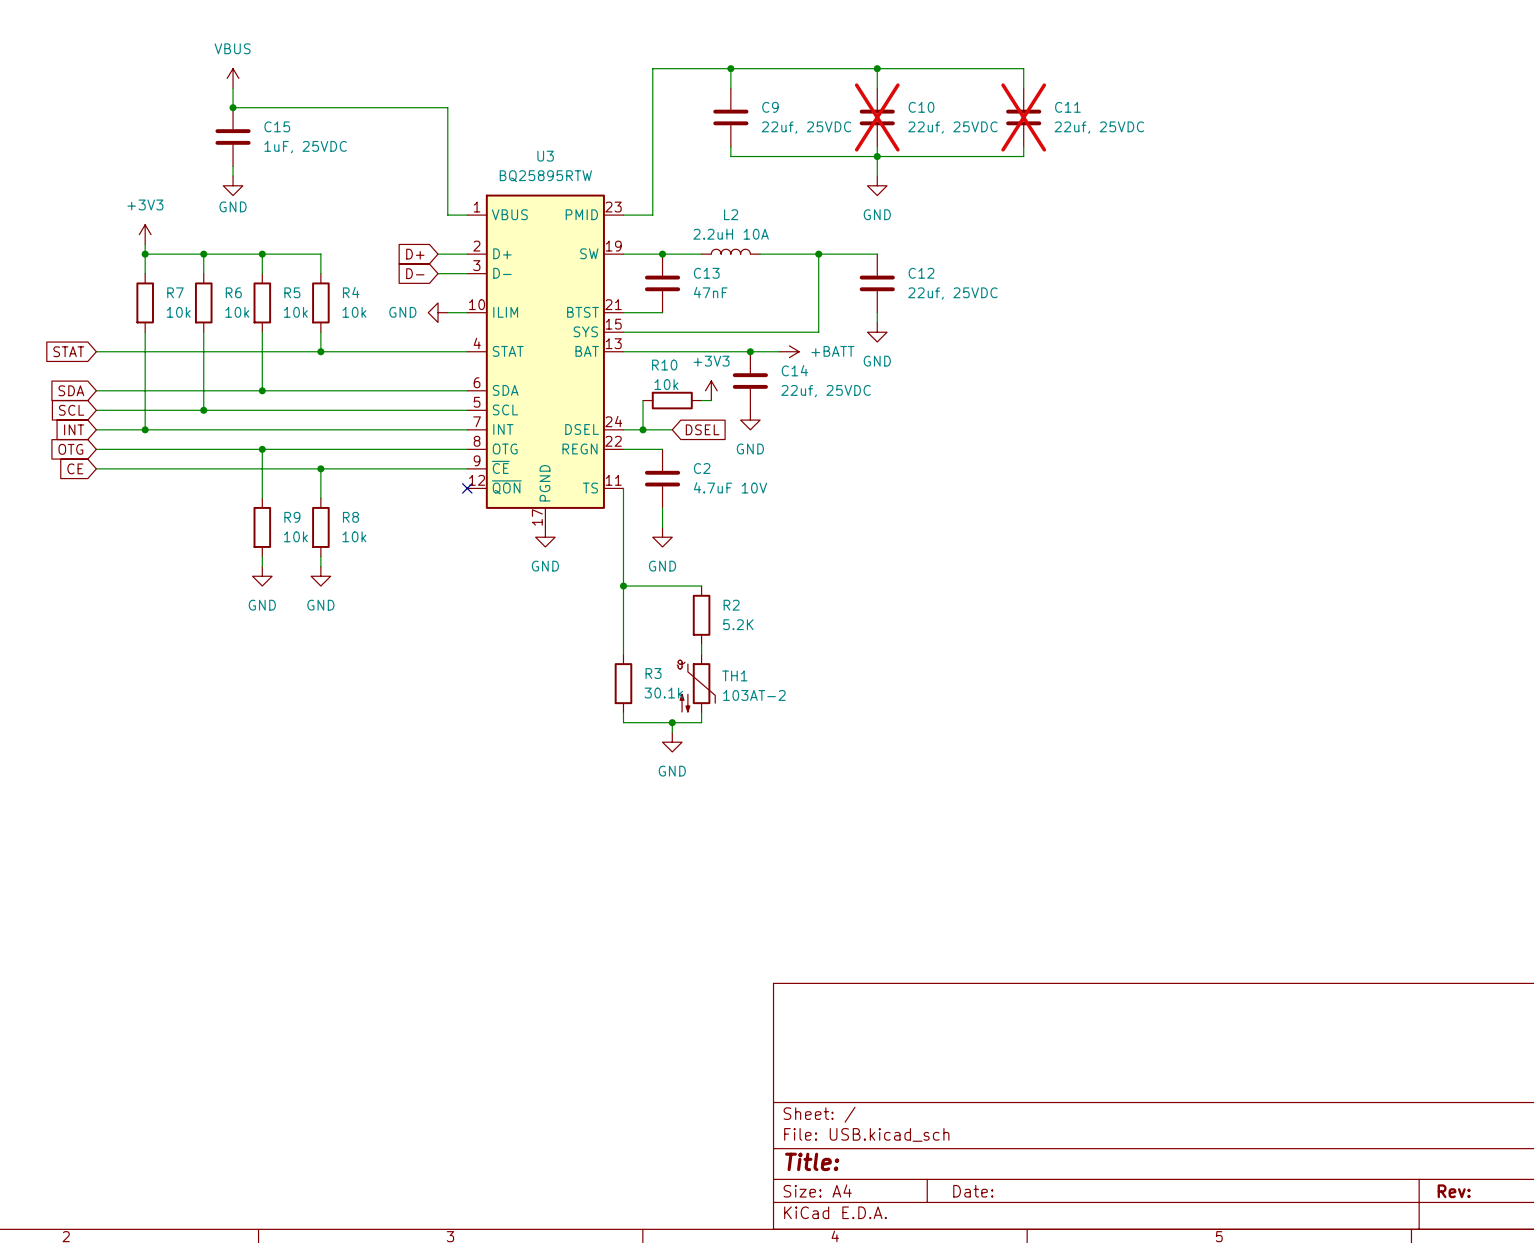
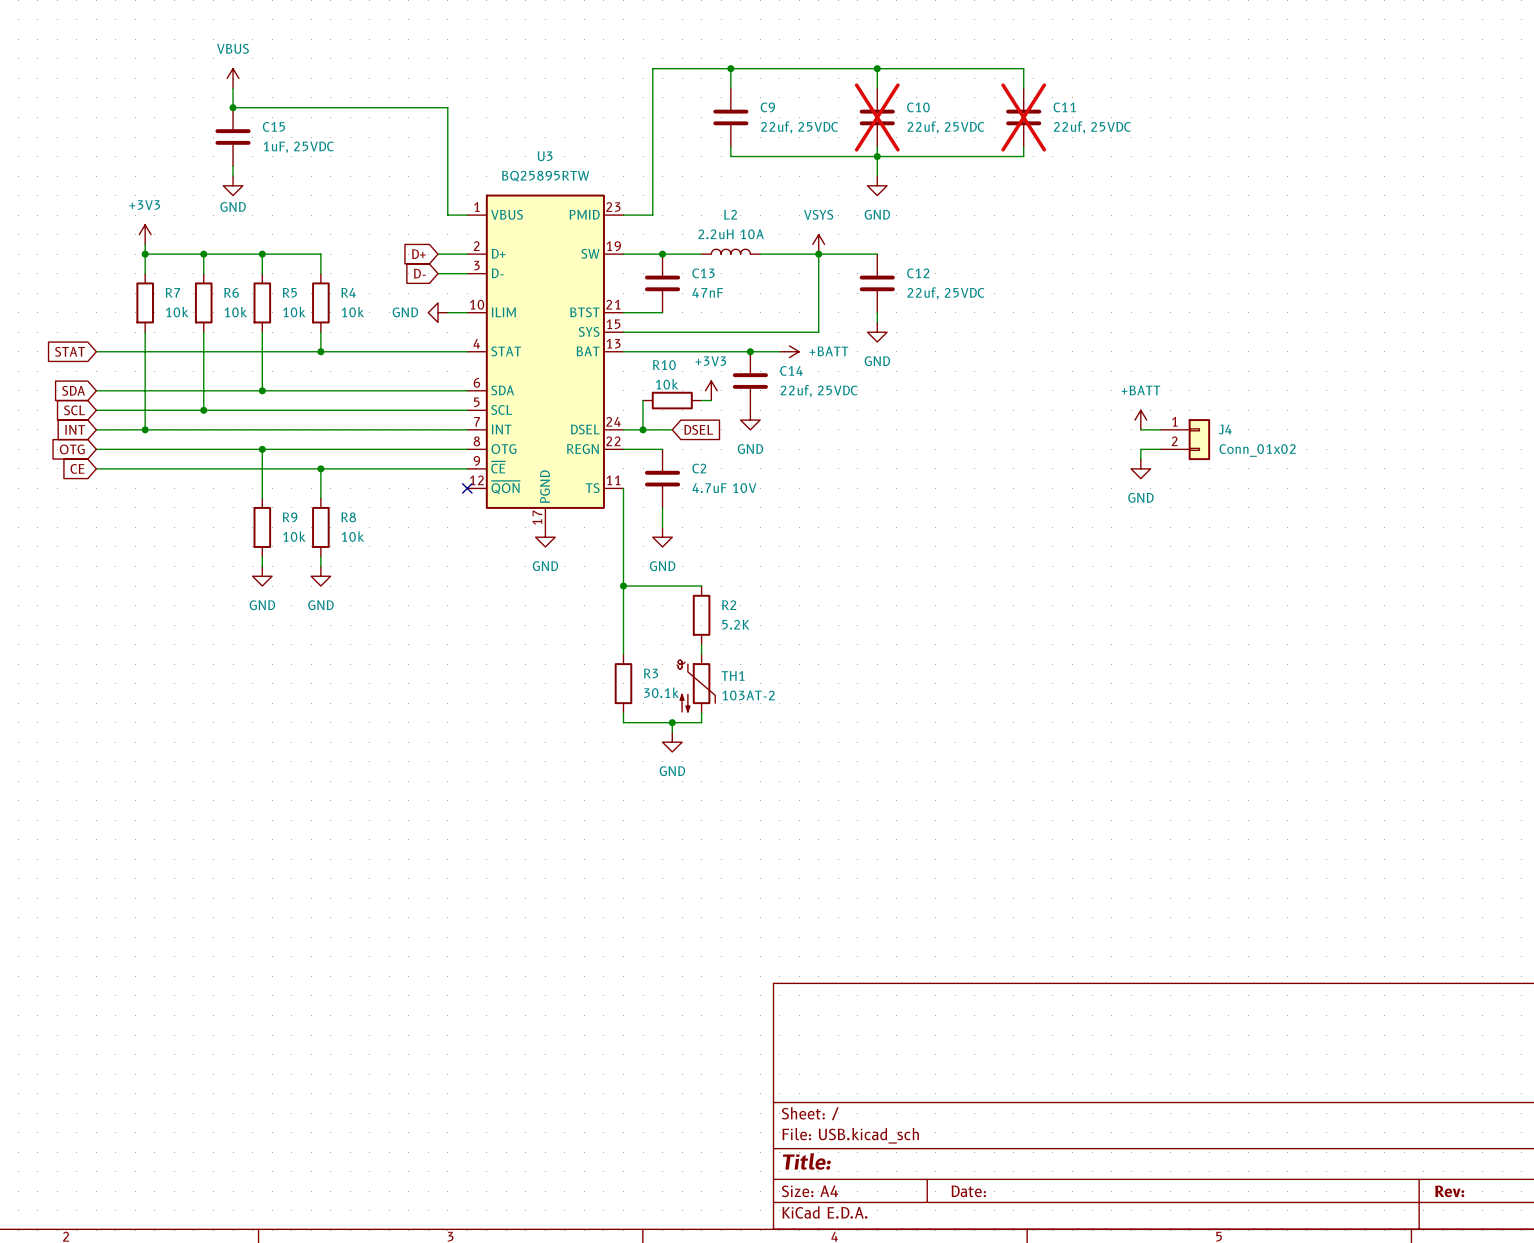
power symbol: none -> VSYS (818, 244)
power symbol: none -> +BATT (1140, 420)
wire: none -> (1140, 429) (1160, 429)
J4: none -> Conn_01x02 (1185, 439)
wire: none -> (1160, 449) (1140, 449) (1140, 459)
power symbol: none -> GND (1140, 468)

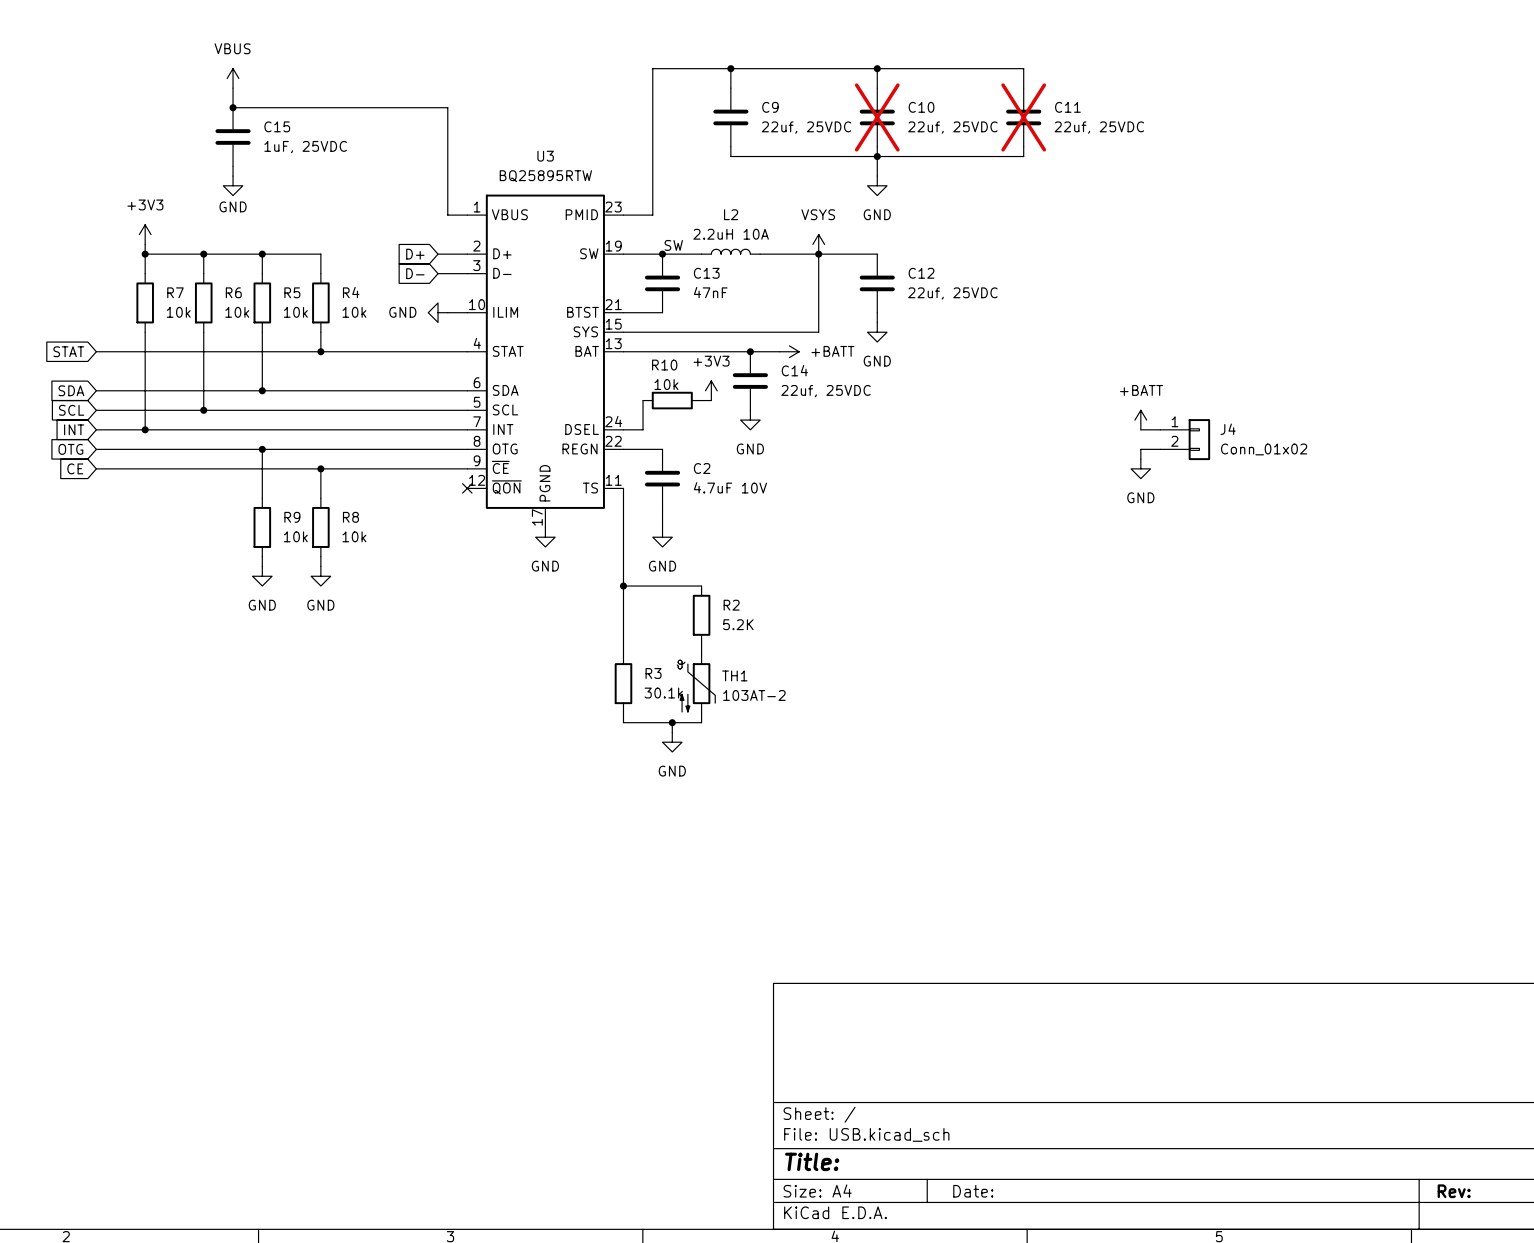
label: none -> SW (673, 245)
wire: (643, 429) (672, 429) -> none
junction: (643, 429) -> none
global label: DSEL (698, 429) -> none

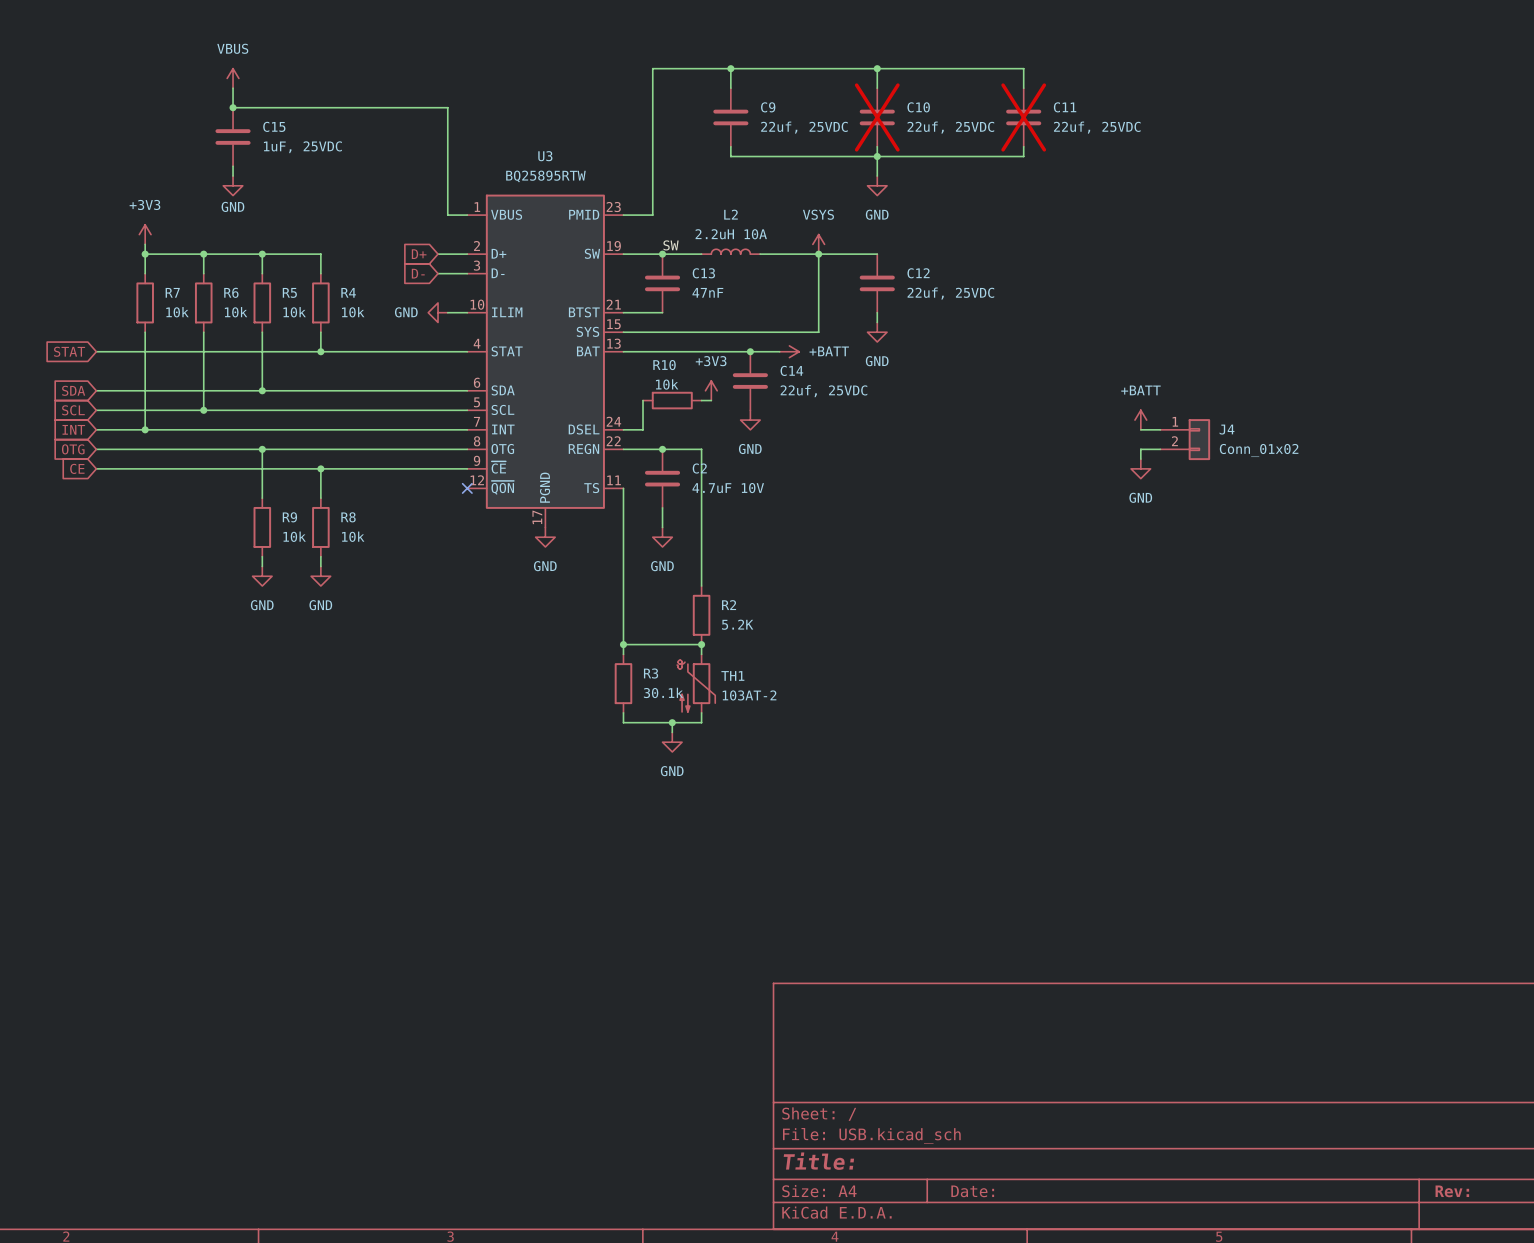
junction: none -> (662, 449)
wire: (623, 586) (701, 586) -> (662, 449) (701, 449) (701, 586)
junction: (623, 586) -> none
wire: none -> (623, 644) (701, 644)
junction: none -> (623, 644)
junction: none -> (701, 644)

